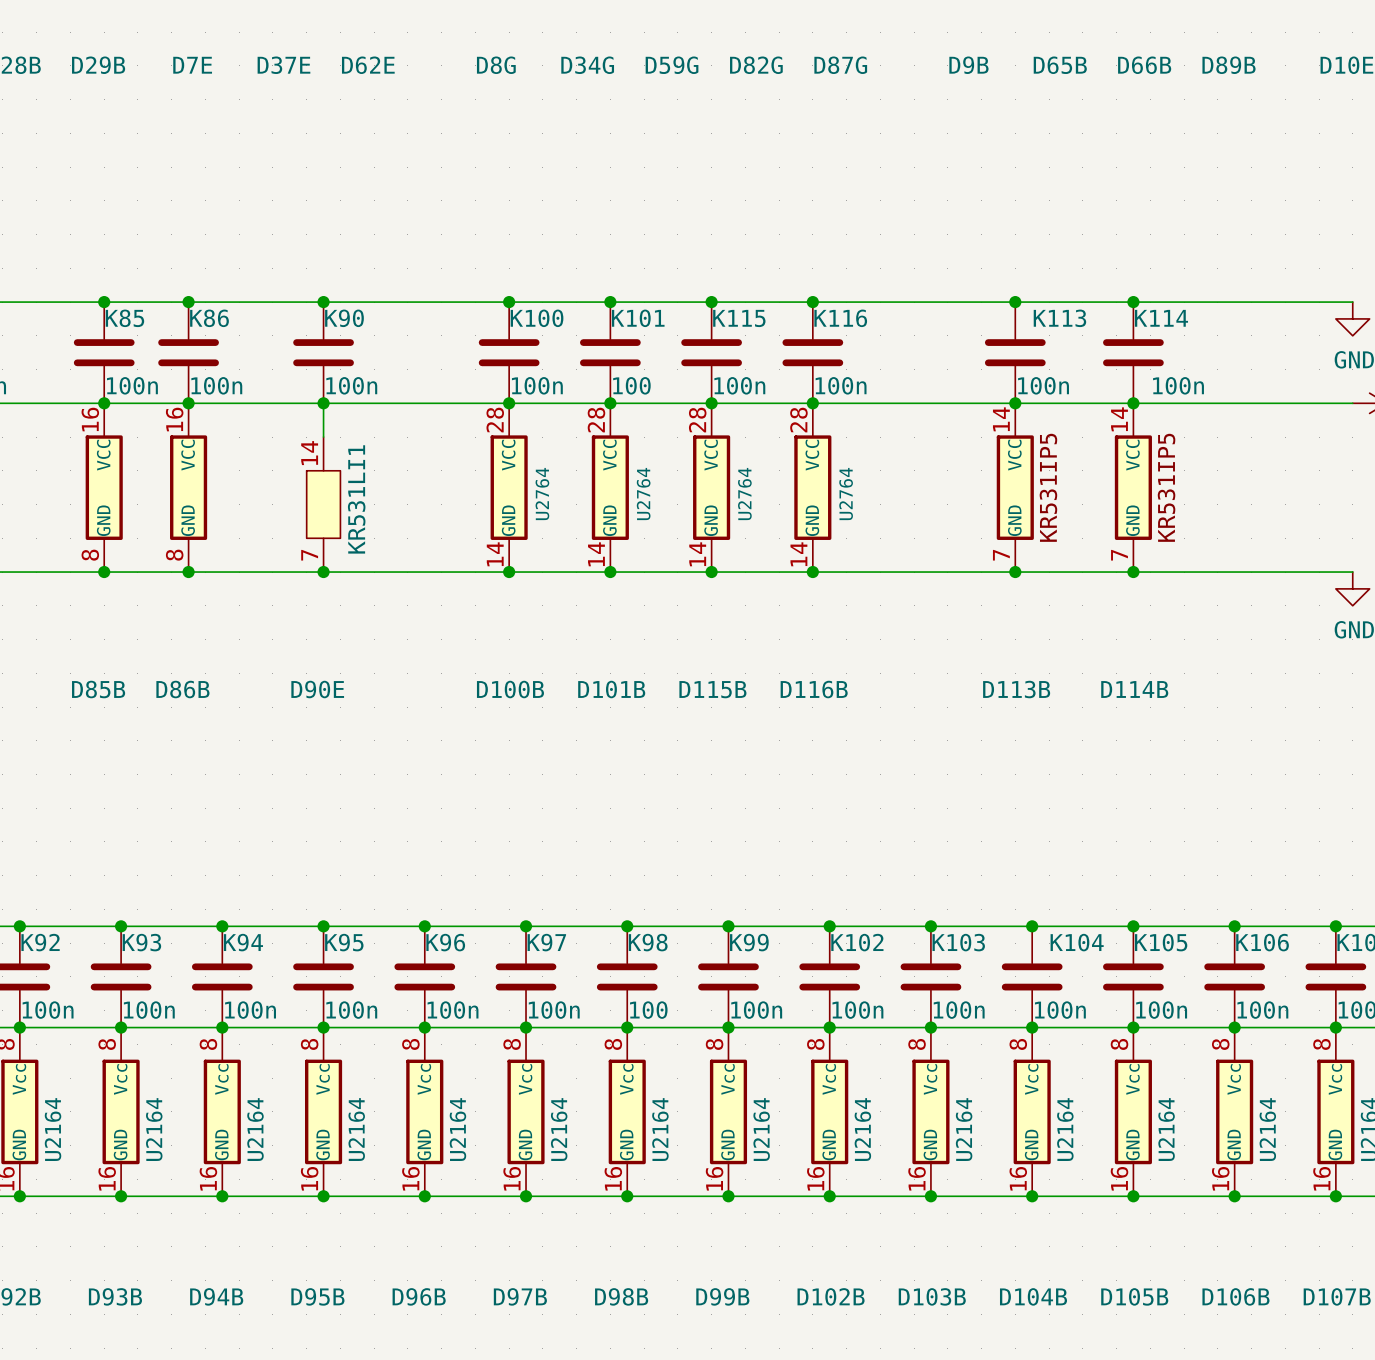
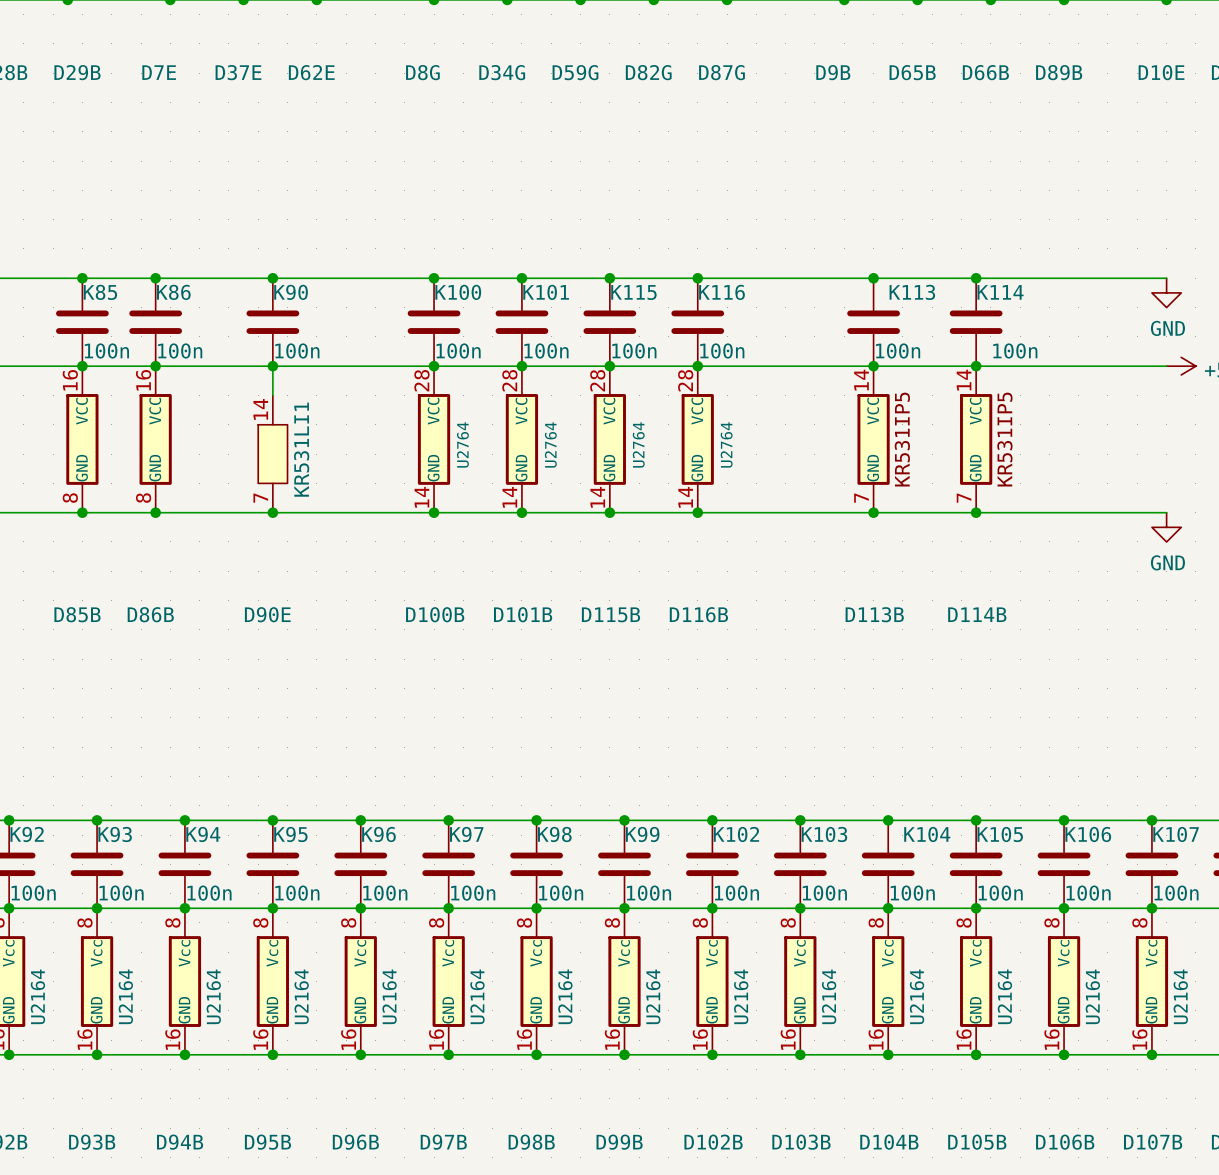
K101 value: 100 (631, 385) -> 100n (546, 350)
K98 value: 100 (648, 1010) -> 100n (561, 893)

